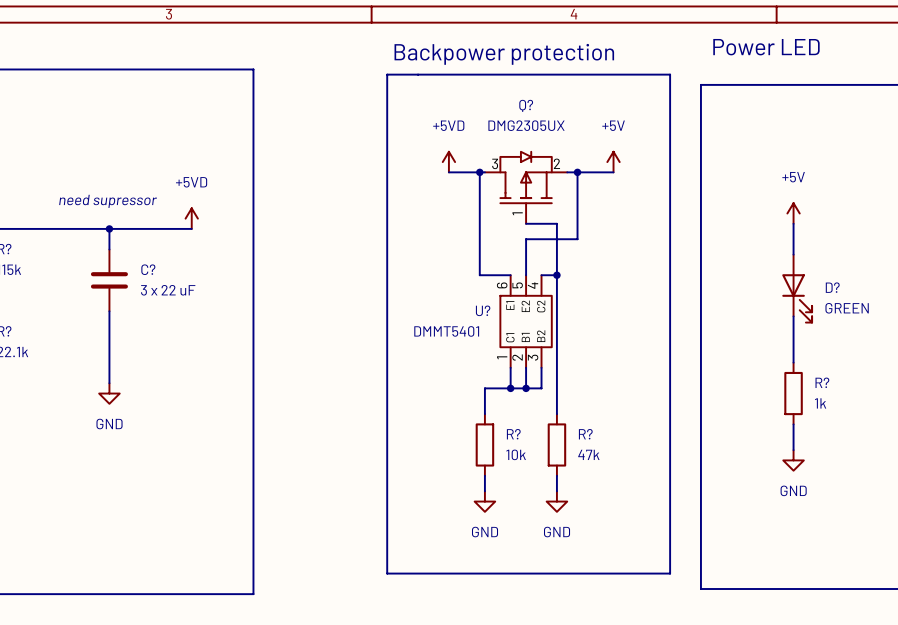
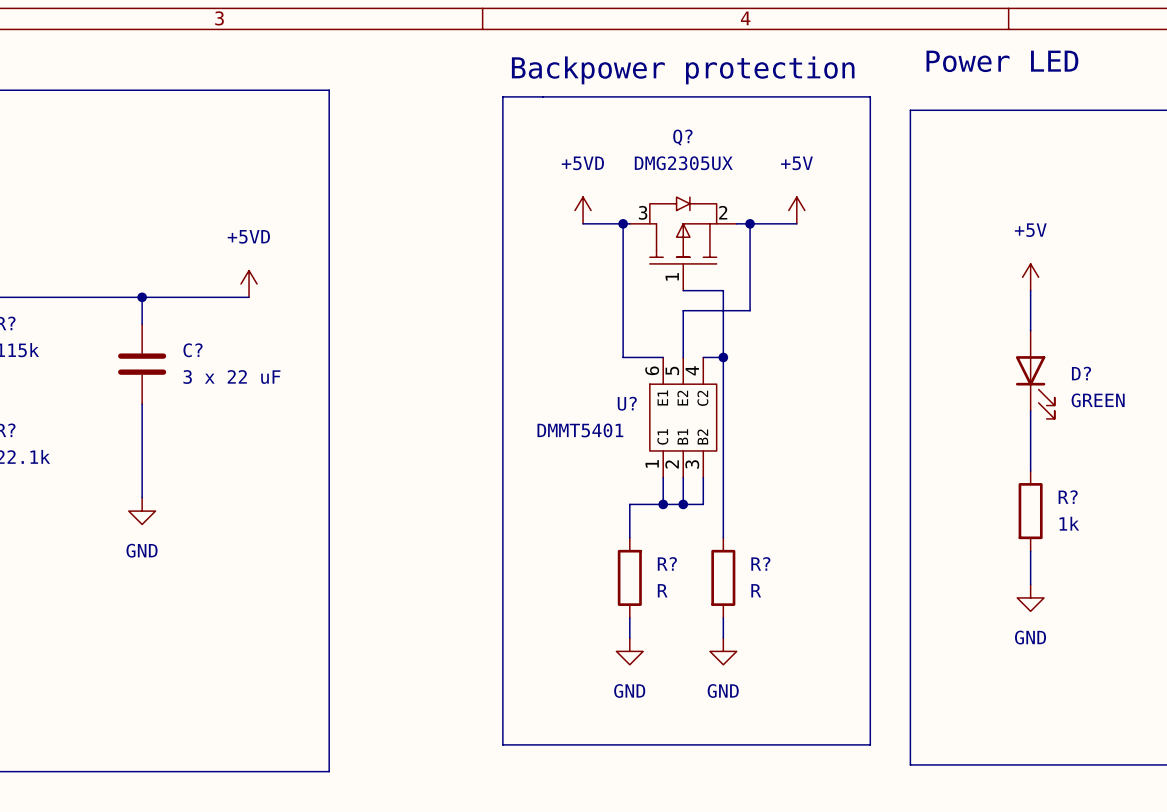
text: need supressor (108, 201) -> none
R? value: 10k (516, 454) -> R (662, 590)
R? value: 47k (588, 454) -> R (756, 590)

